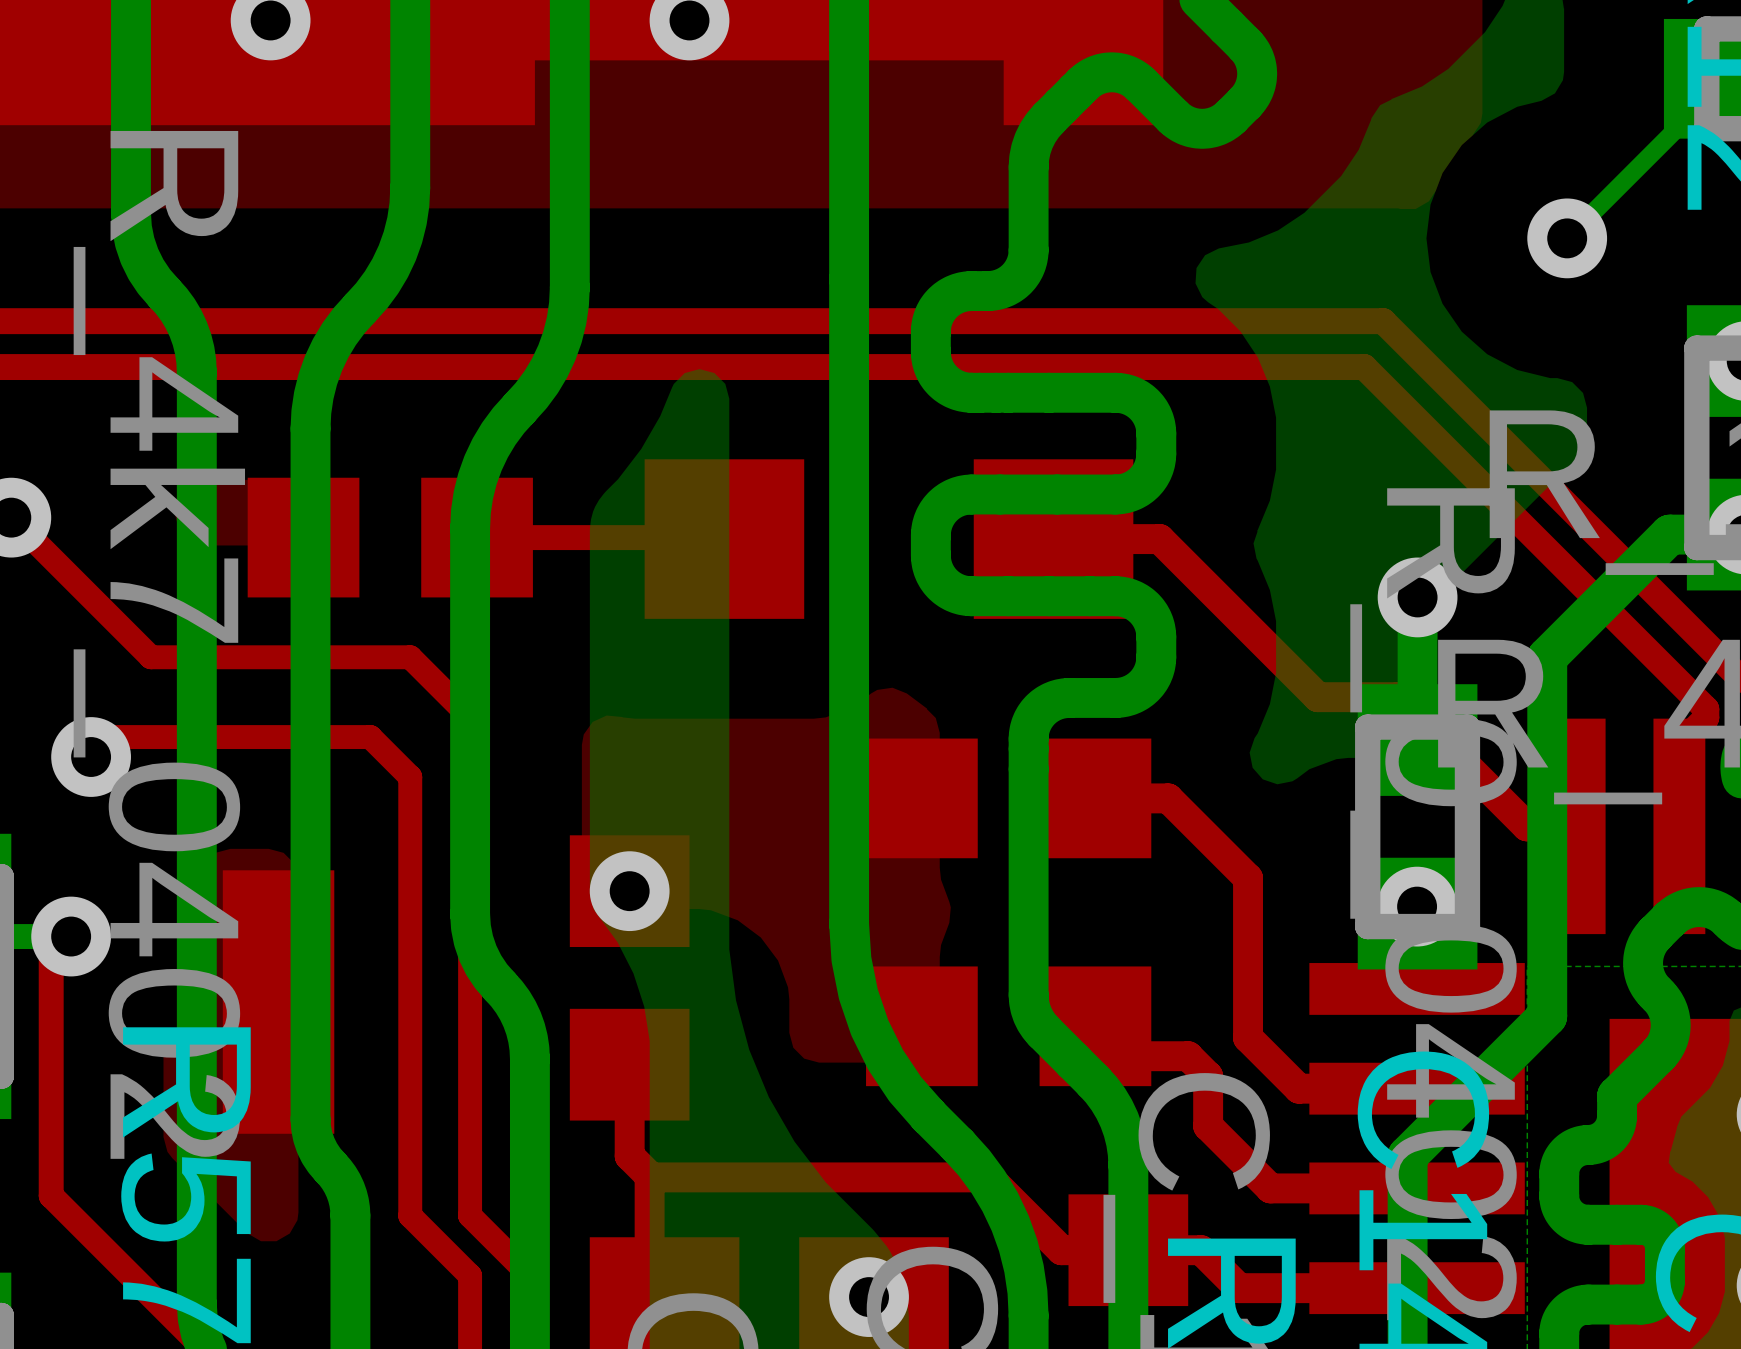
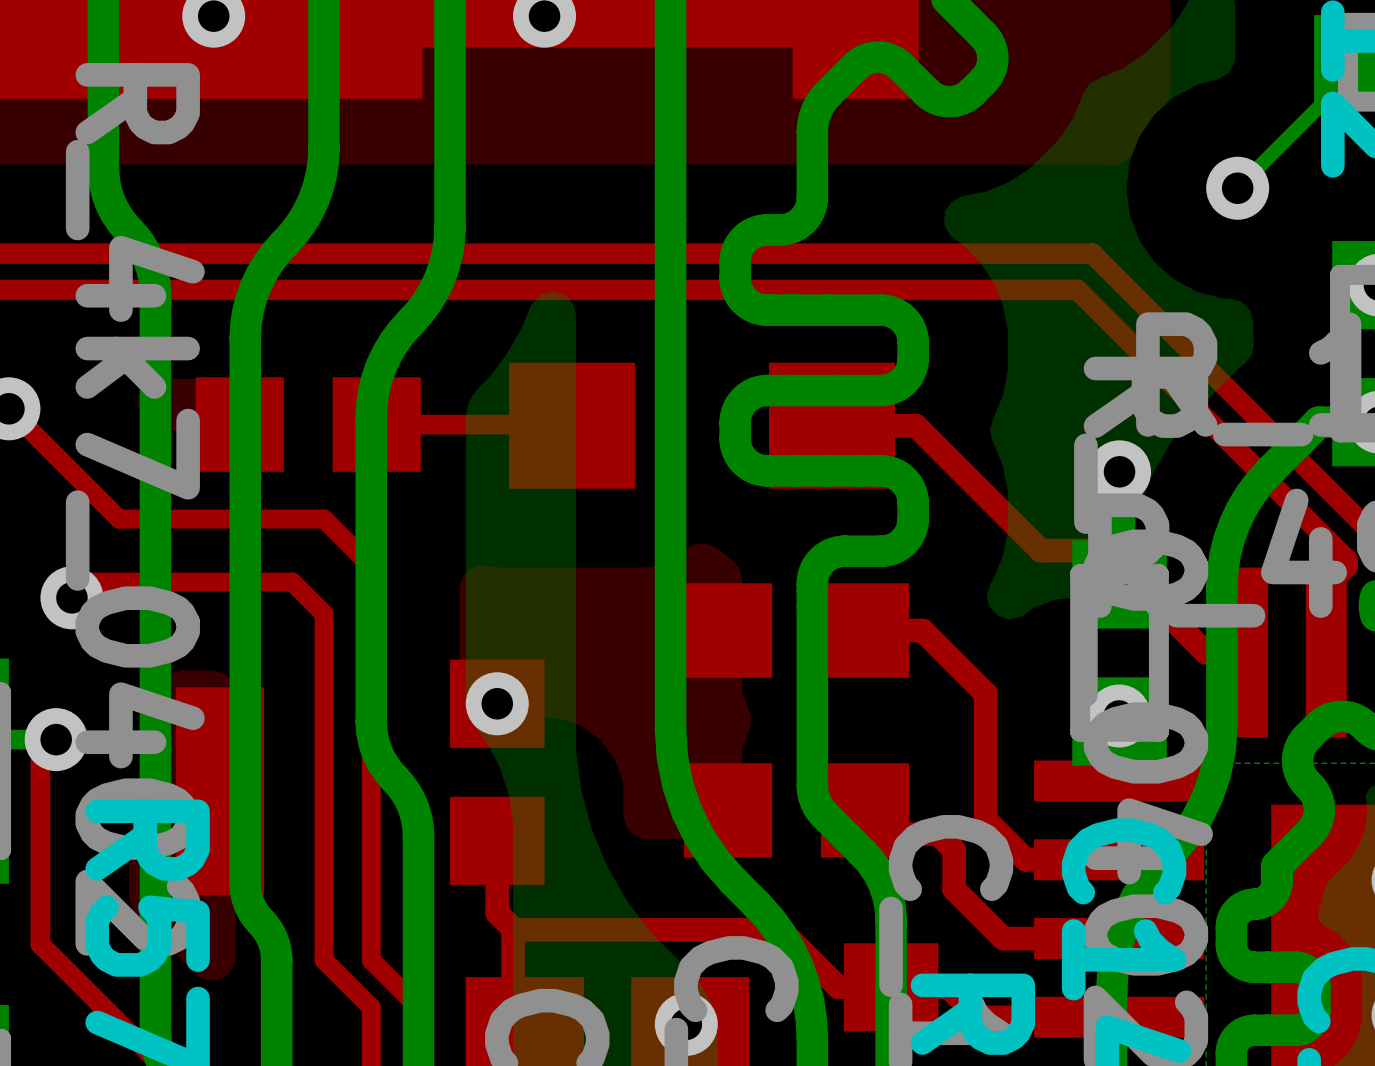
bottom track: (1608, 595) (1547, 657) (1547, 744) -> (1270, 470) (1249, 495) (1234, 524) (1225, 555) (1221, 587)
bottom track: (1547, 917) (1547, 1016) (1407, 1155) (1407, 1254) -> (1221, 724) (1220, 749) (1215, 773) (1207, 796) (1196, 818) (1183, 839) (1150, 876) (1136, 896) (1125, 918) (1118, 942) (1113, 966) (1111, 990)

